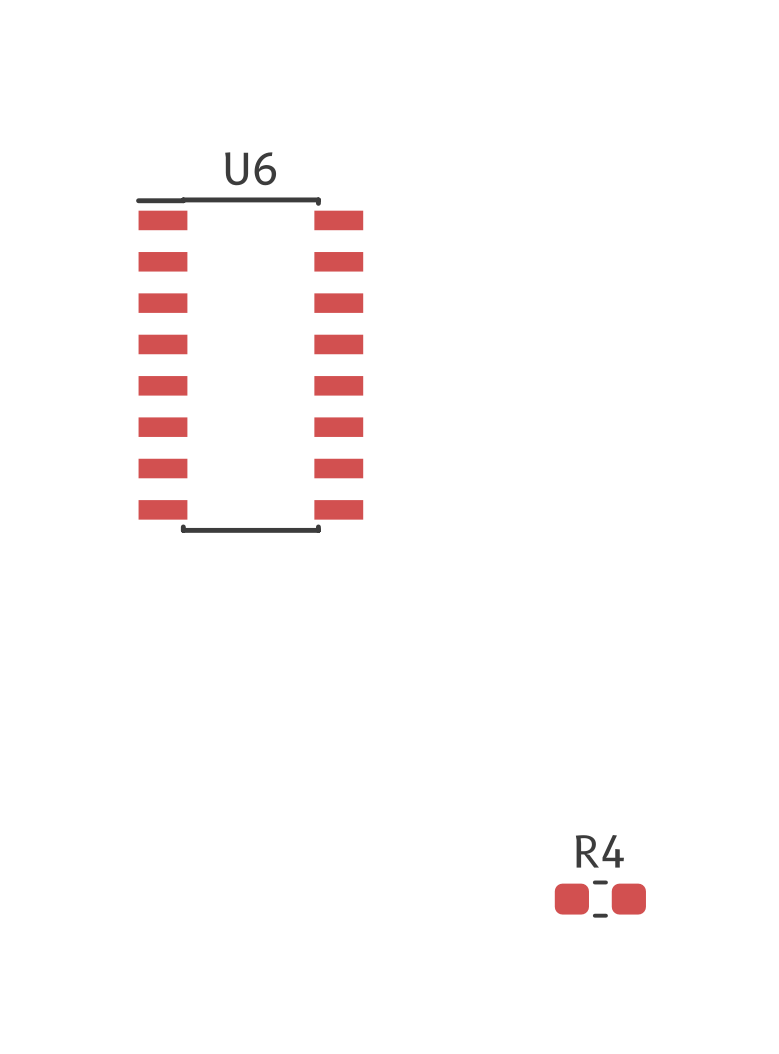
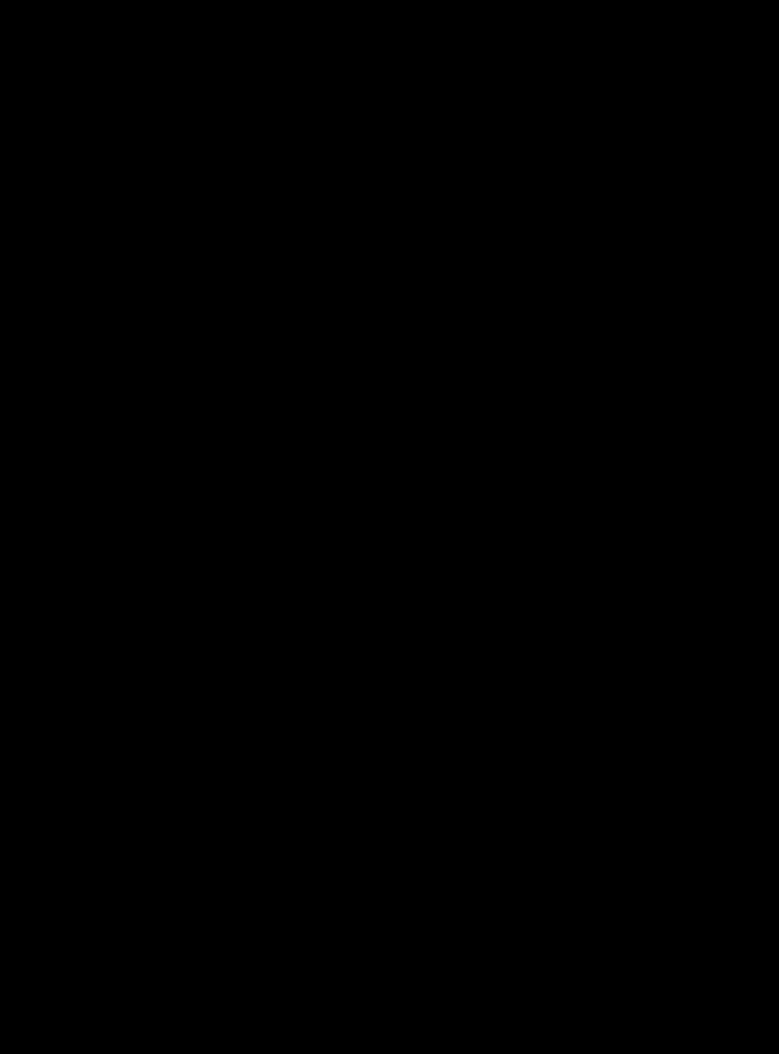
U6: (249, 365) -> none
R4: (600, 899) -> none

